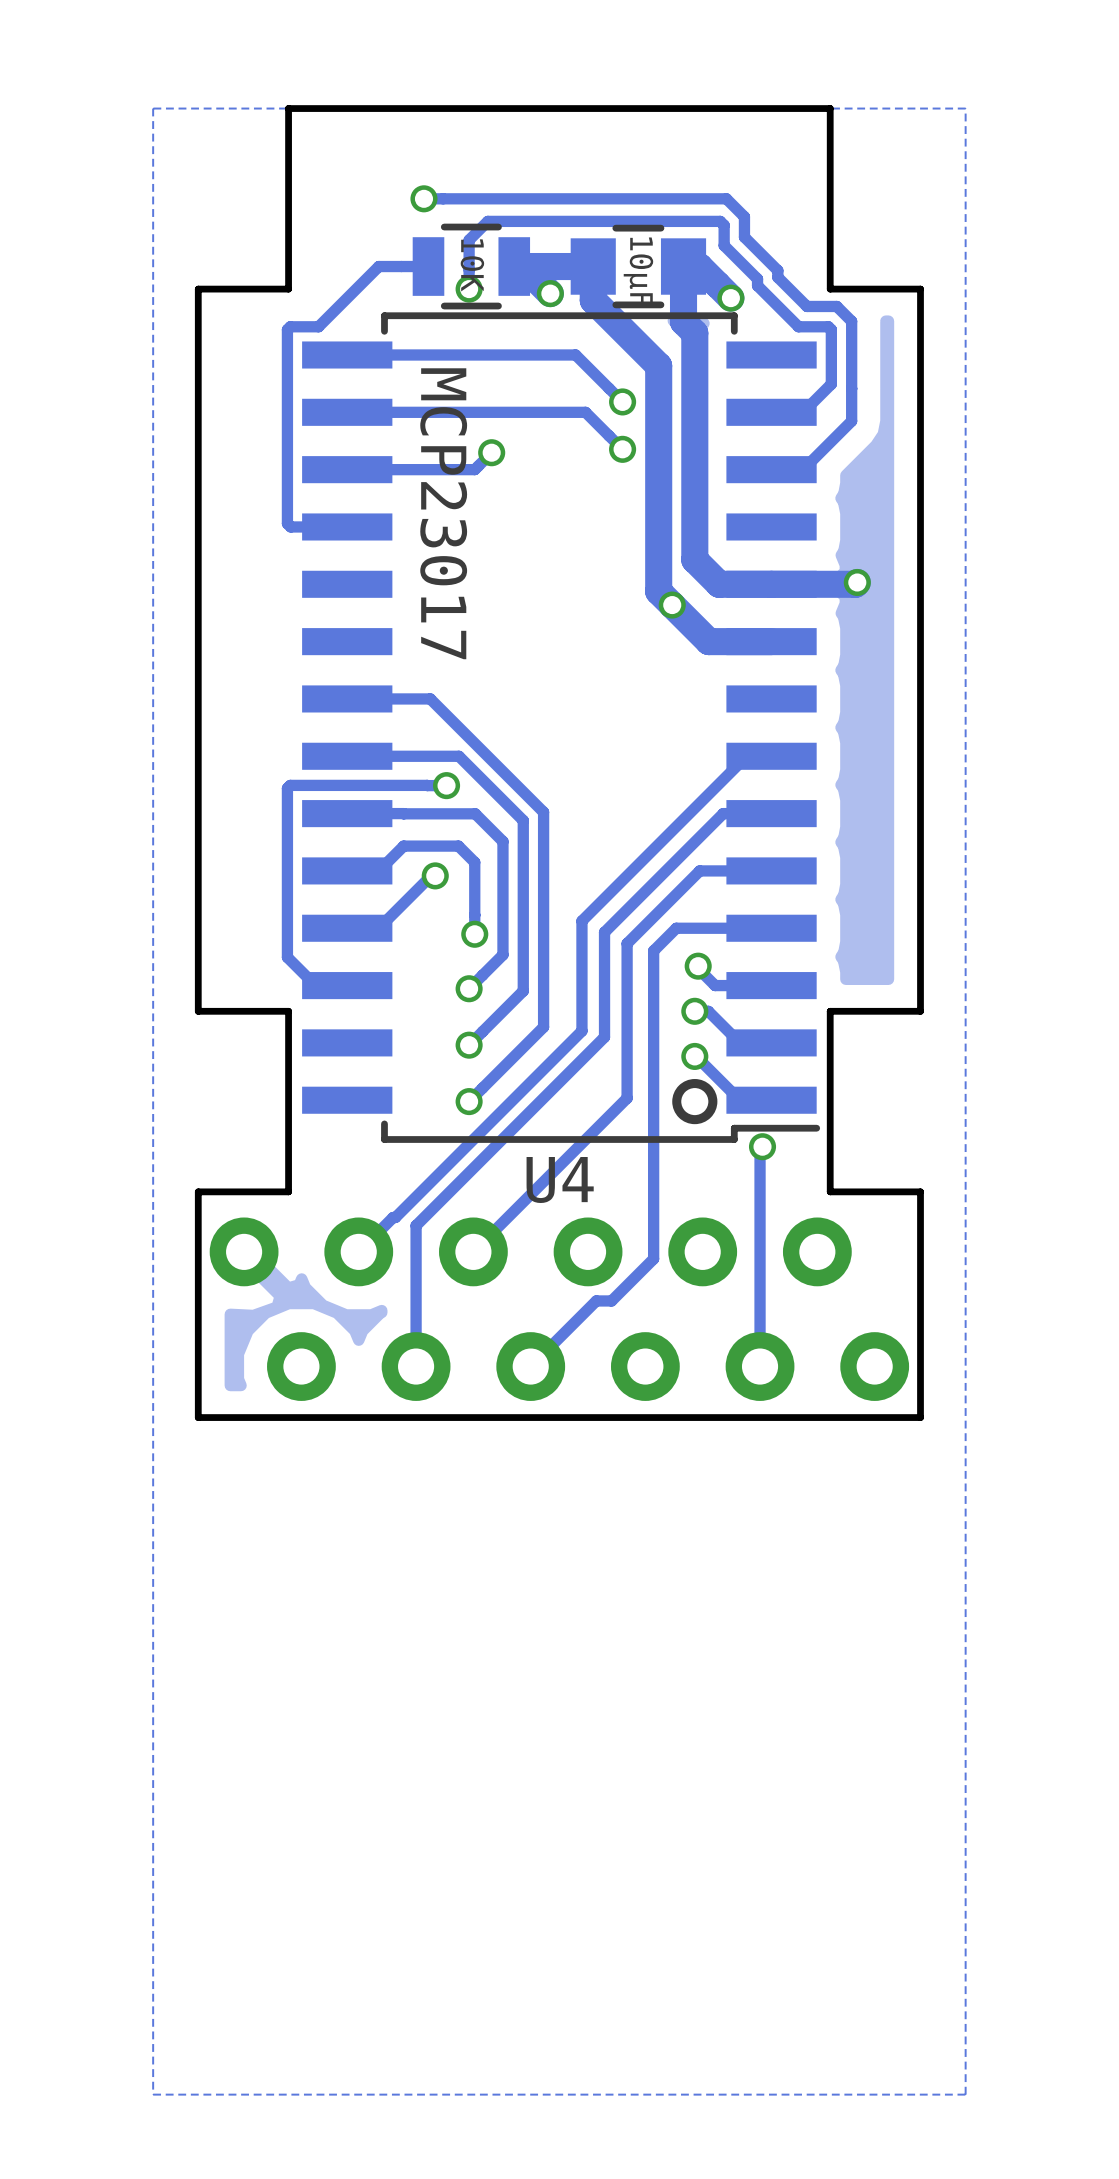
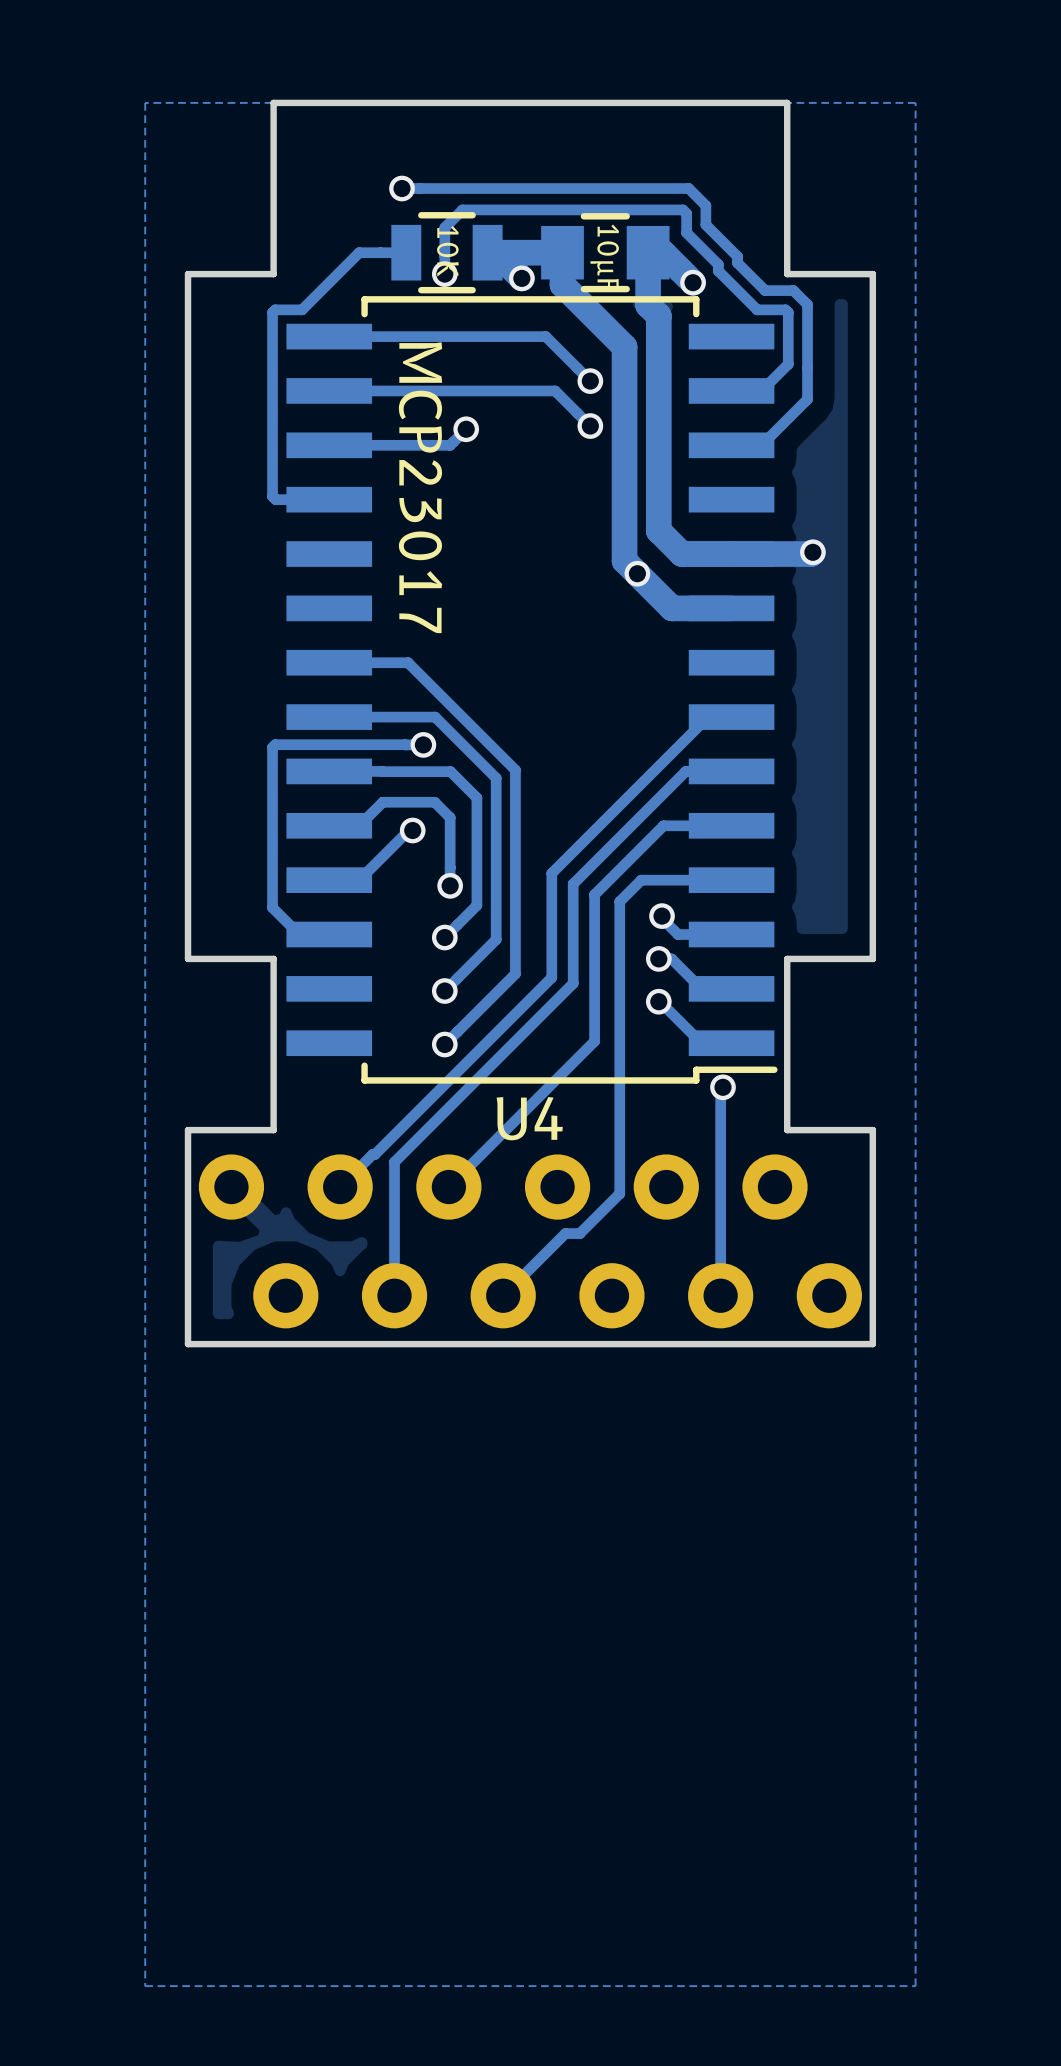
drawing: [672, 1079, 718, 1125] -> none

